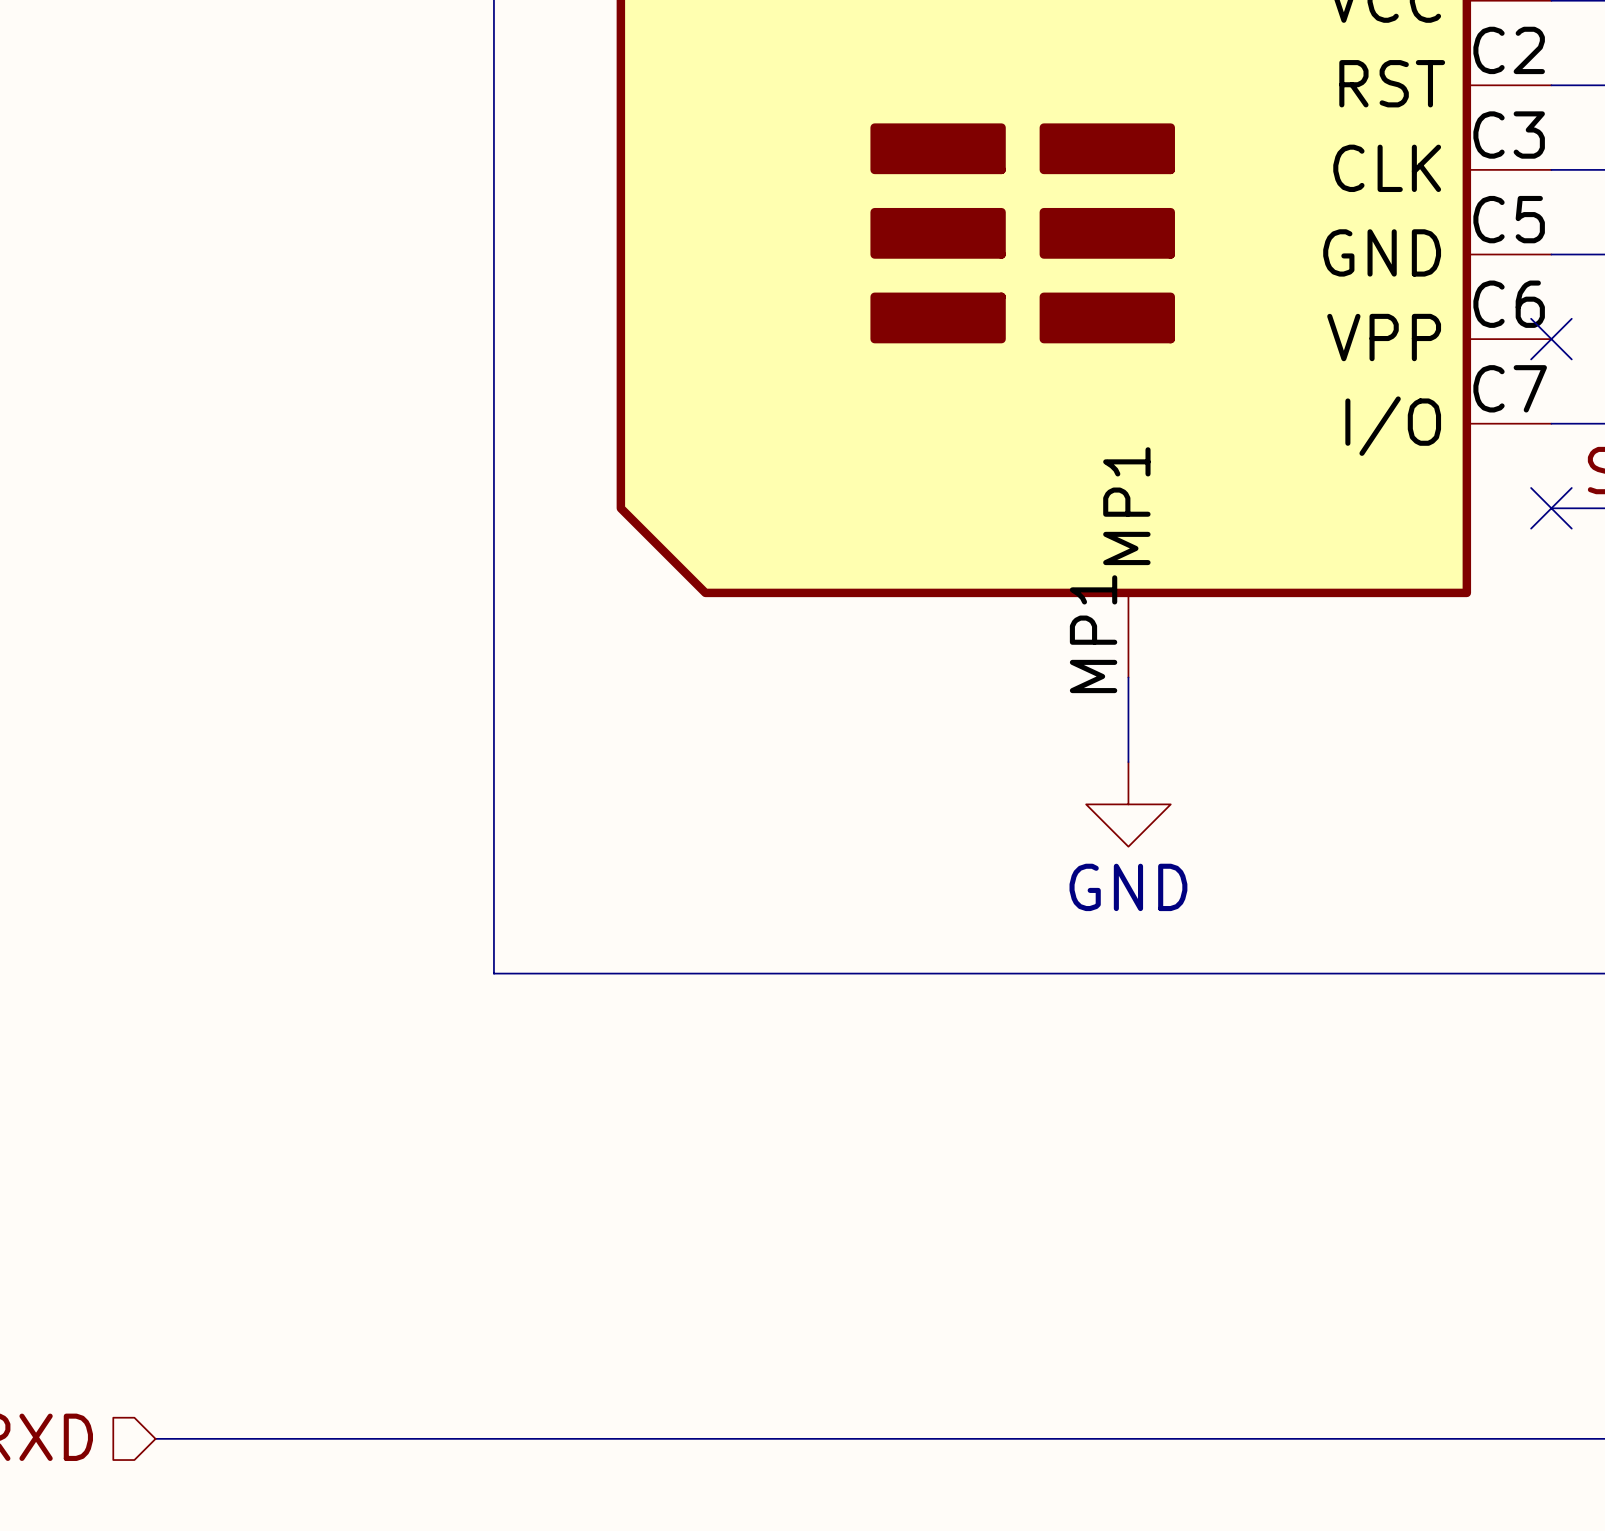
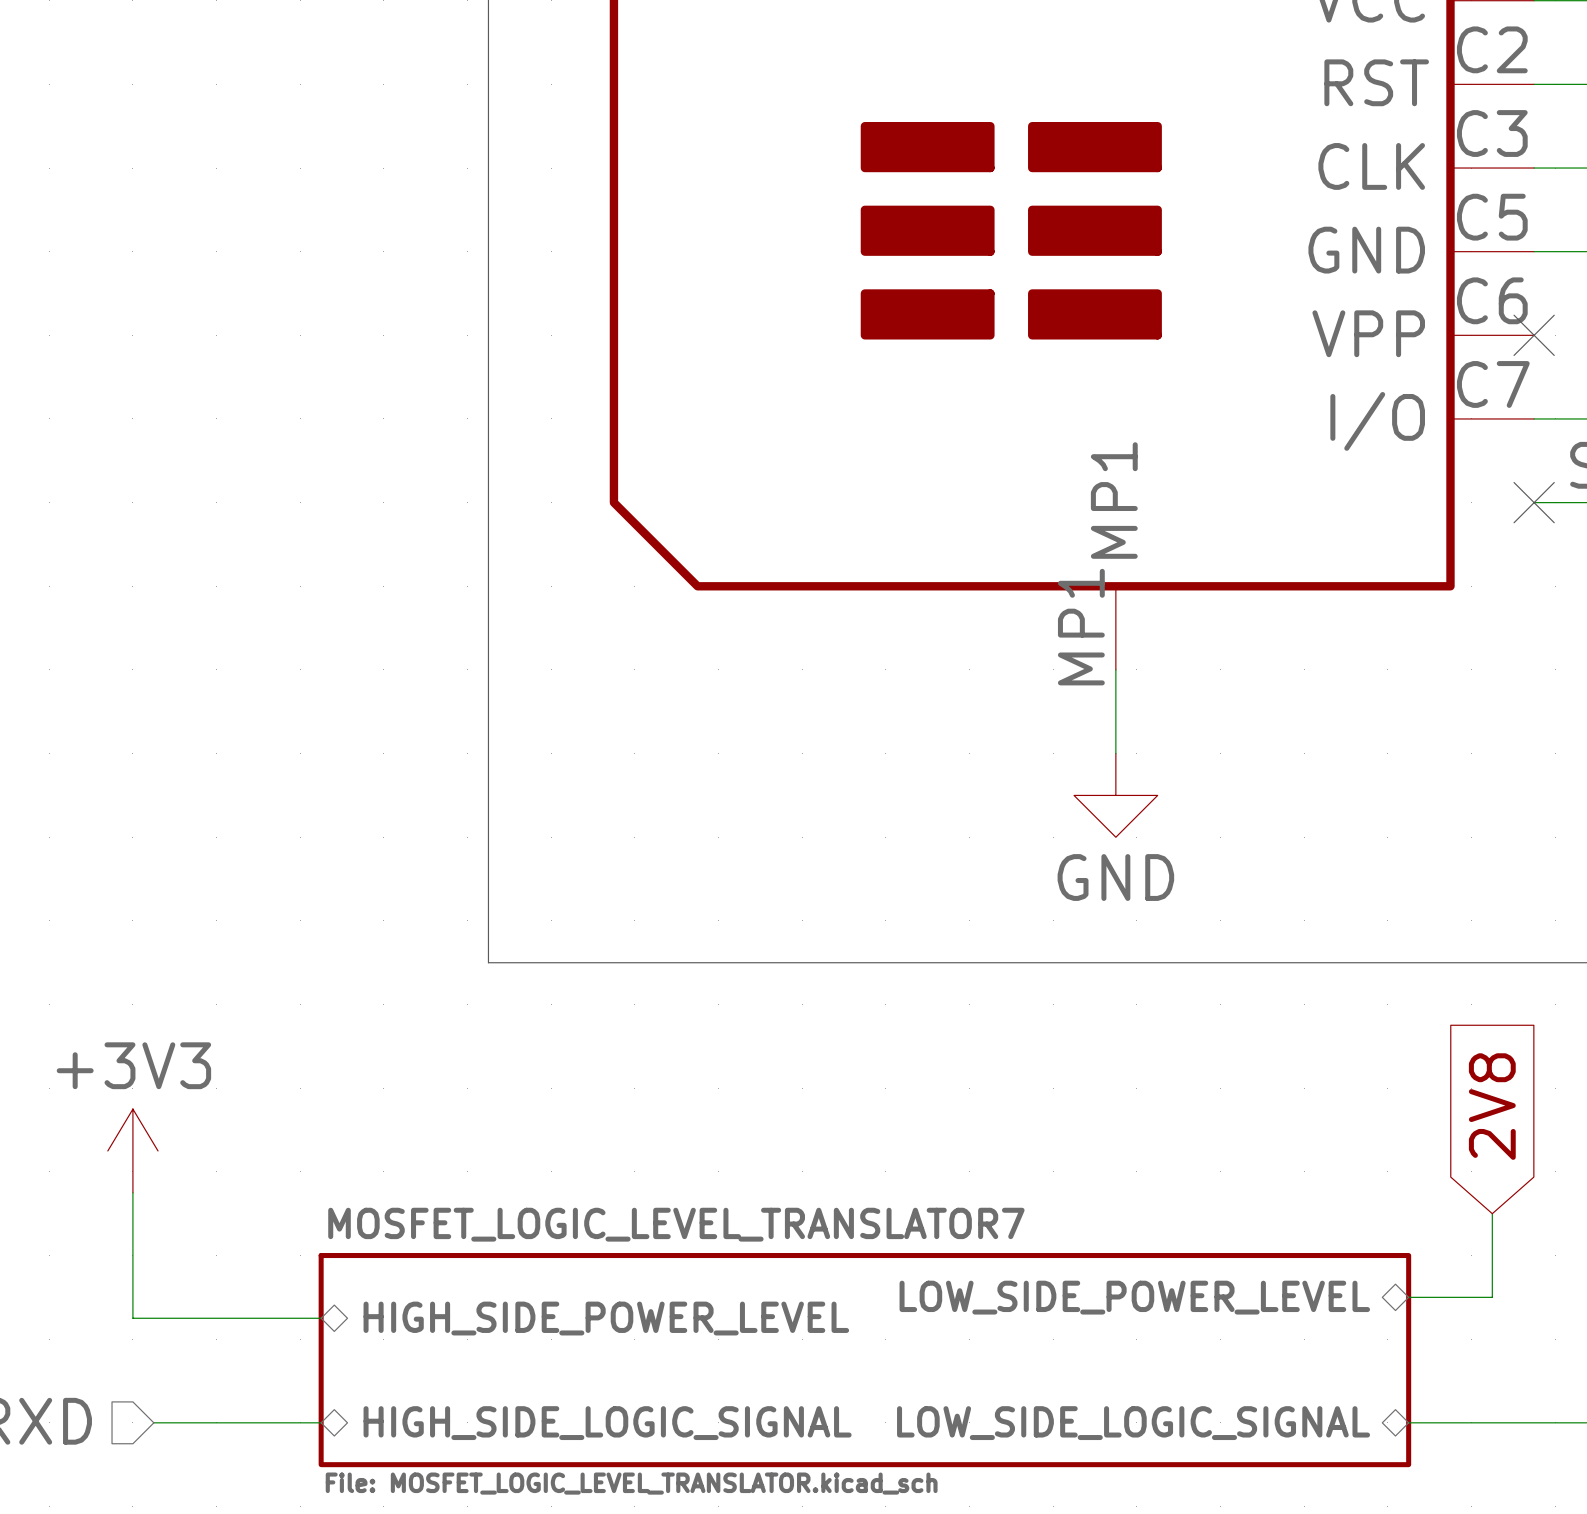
global label: none -> 2V8 (1492, 1106)
power symbol: none -> +3V3 (132, 1150)
wire: none -> (132, 1192) (132, 1318) (321, 1318)
wire: none -> (1492, 1213) (1492, 1297) (1408, 1297)
sheet pin: none -> LOW_SIDE_POWER_LEVEL (1134, 1297)
sheet pin: none -> HIGH_SIDE_POWER_LEVEL (606, 1318)
sheet MOSFET_LOGIC_LEVEL_TRANSLATOR7: none -> File: MOSFET_LOGIC_LEVEL_TRANSLATOR.kicad_sch (864, 1360)
wire: (324, 1438) (1424, 1438) -> none
sheet pin: none -> HIGH_SIDE_LOGIC_SIGNAL (607, 1423)
sheet pin: none -> LOW_SIDE_LOGIC_SIGNAL (1133, 1423)

